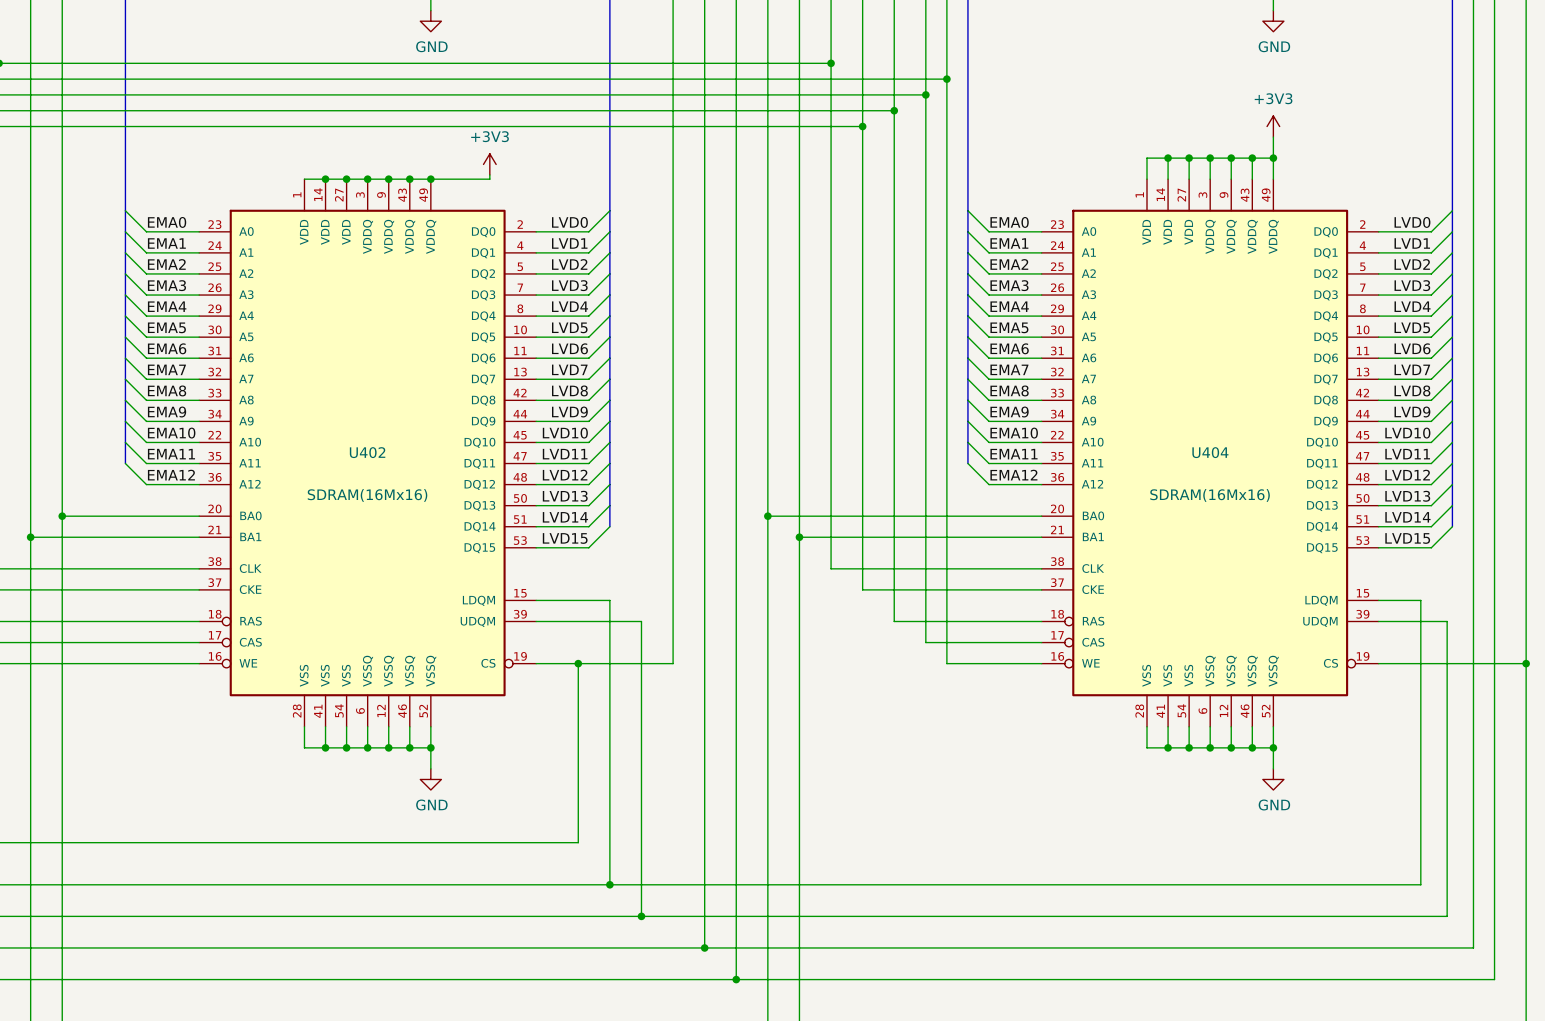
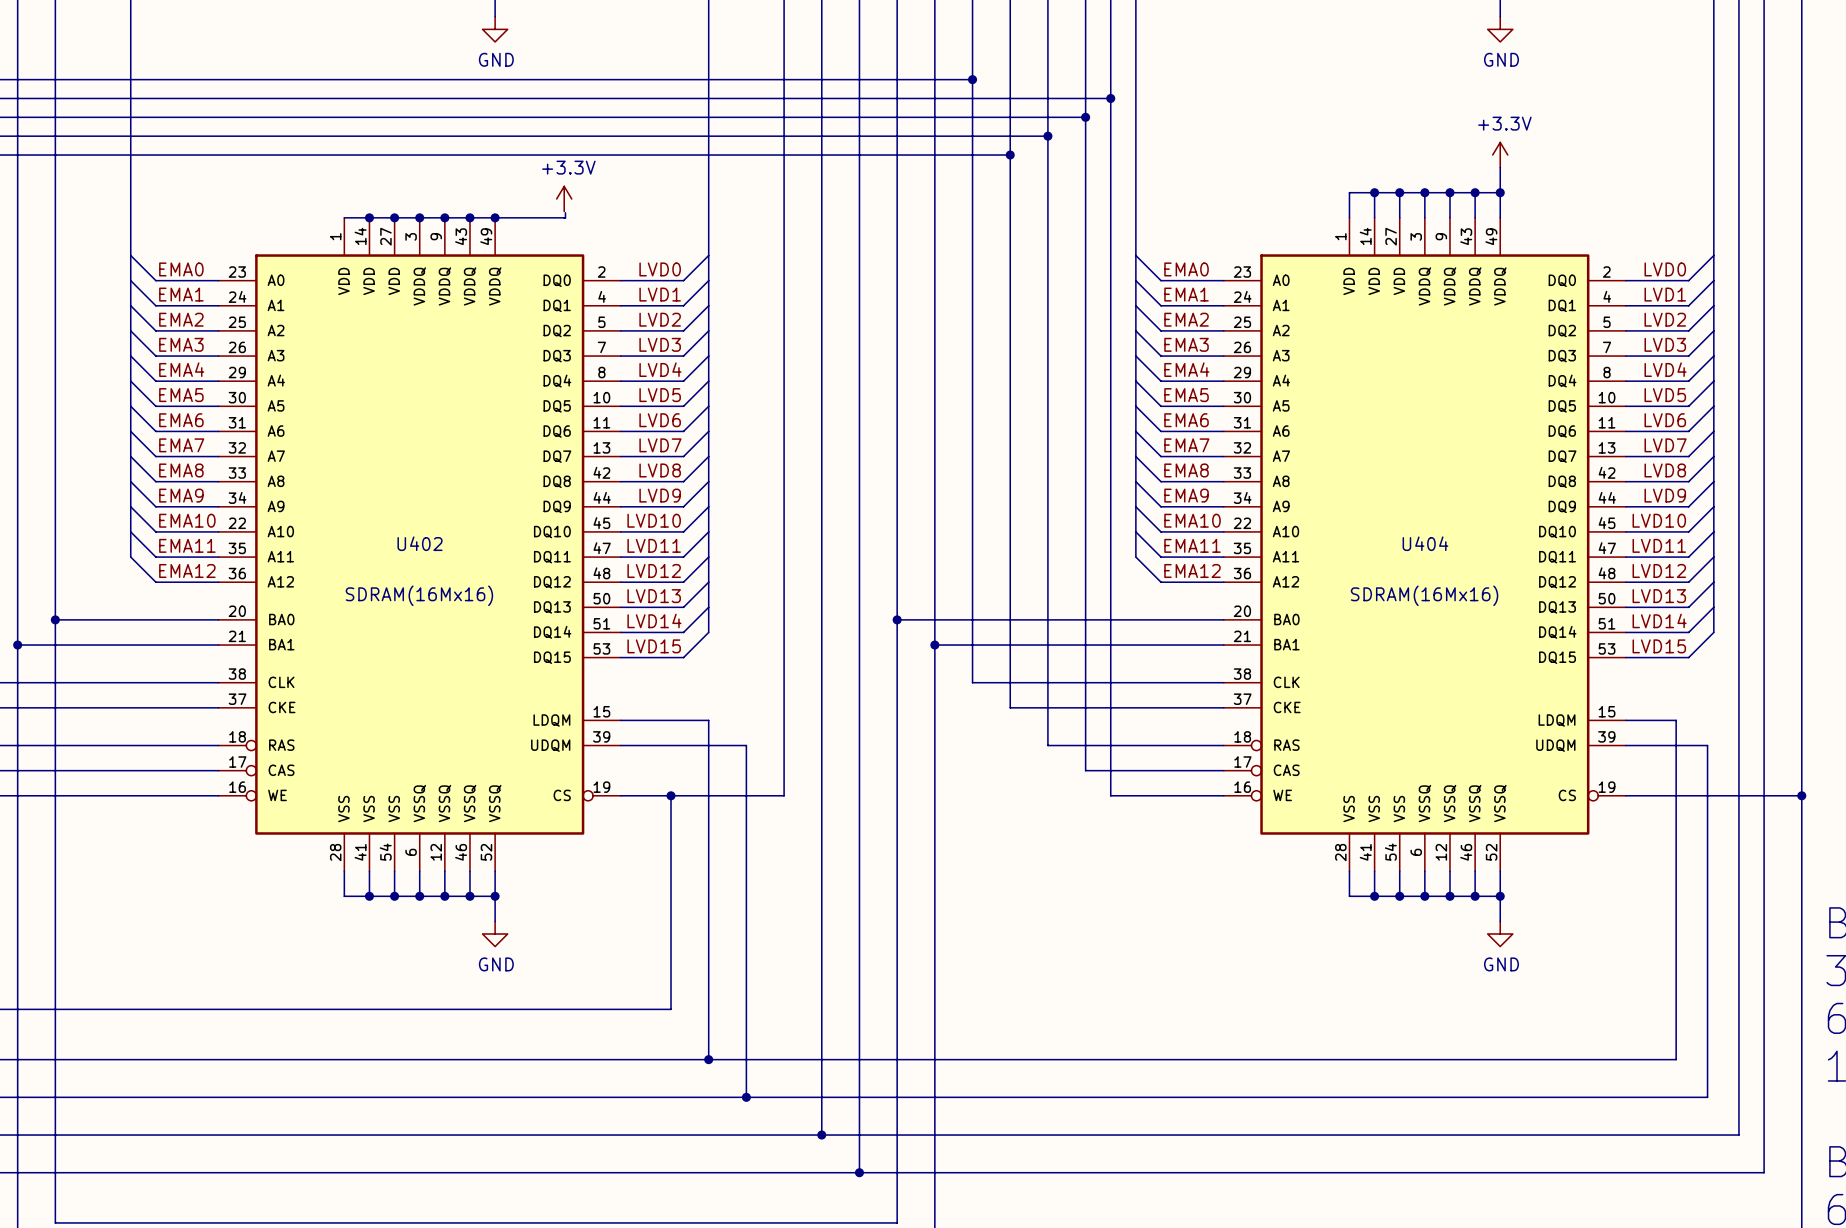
power symbol: +3V3 (1273, 126) -> +3.3V (1500, 155)
power symbol: +3V3 (489, 164) -> +3.3V (564, 198)

